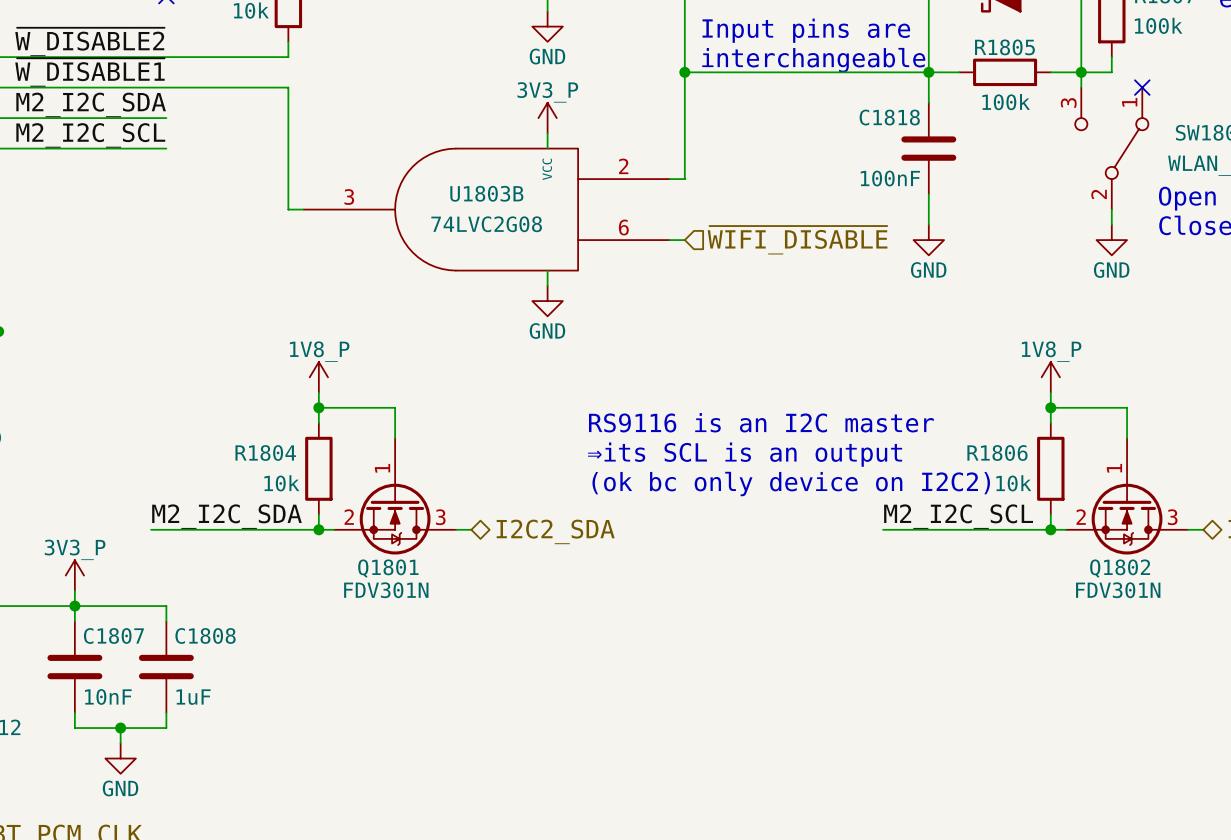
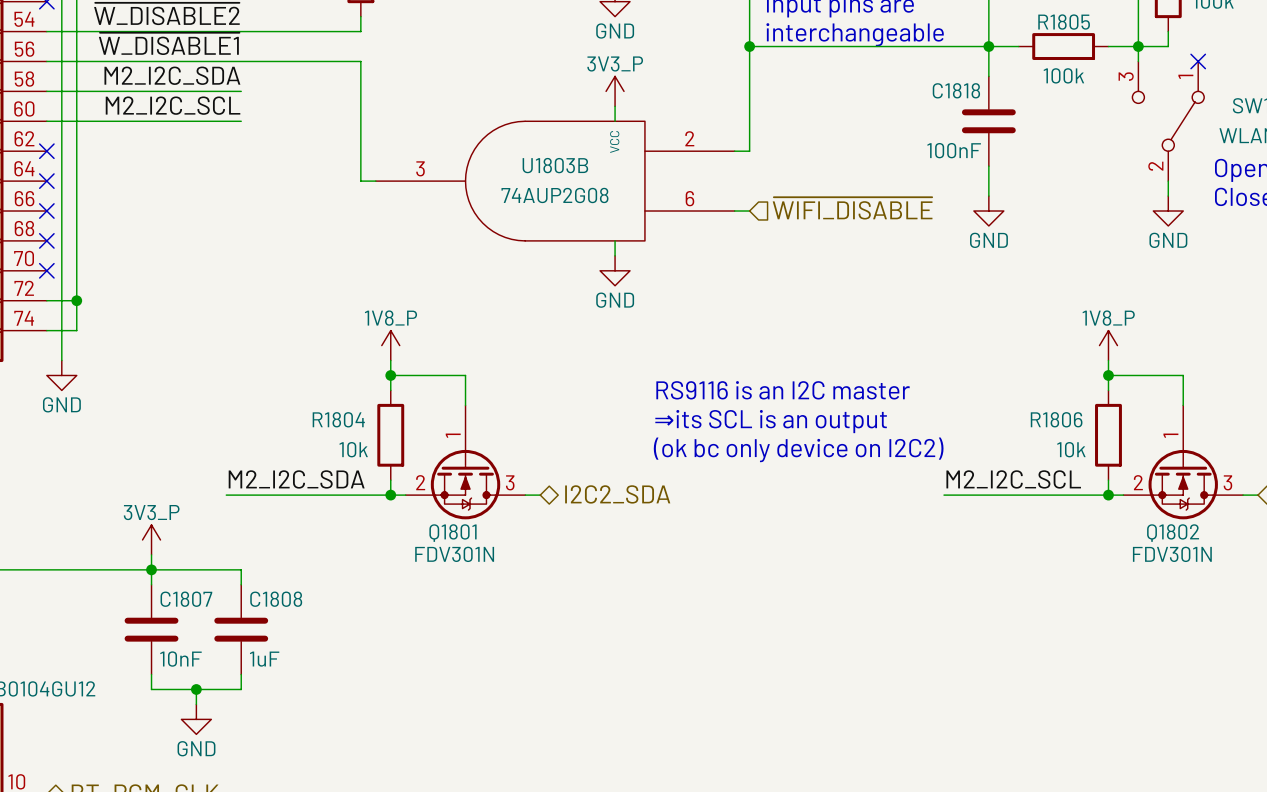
U1803B value: 74LVC2G08 (486, 224) -> 74AUP2G08 (554, 195)

